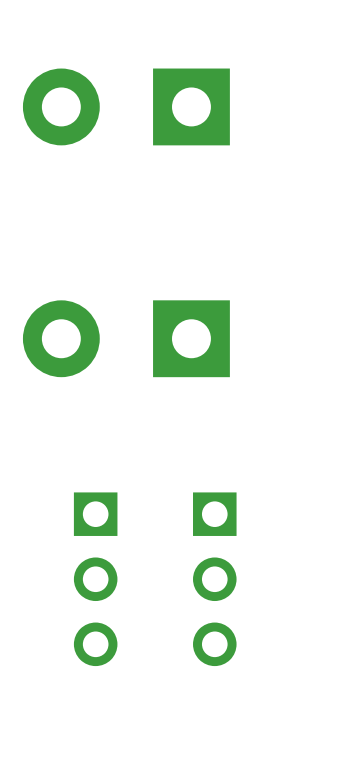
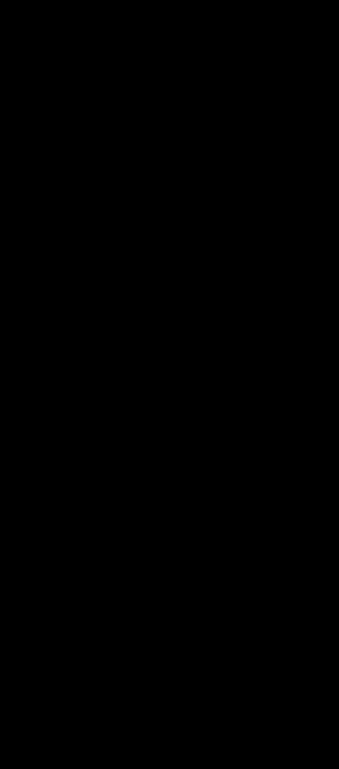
part: (126, 106) -> none
part: (126, 338) -> none
part: (95, 579) -> none
part: (214, 579) -> none

